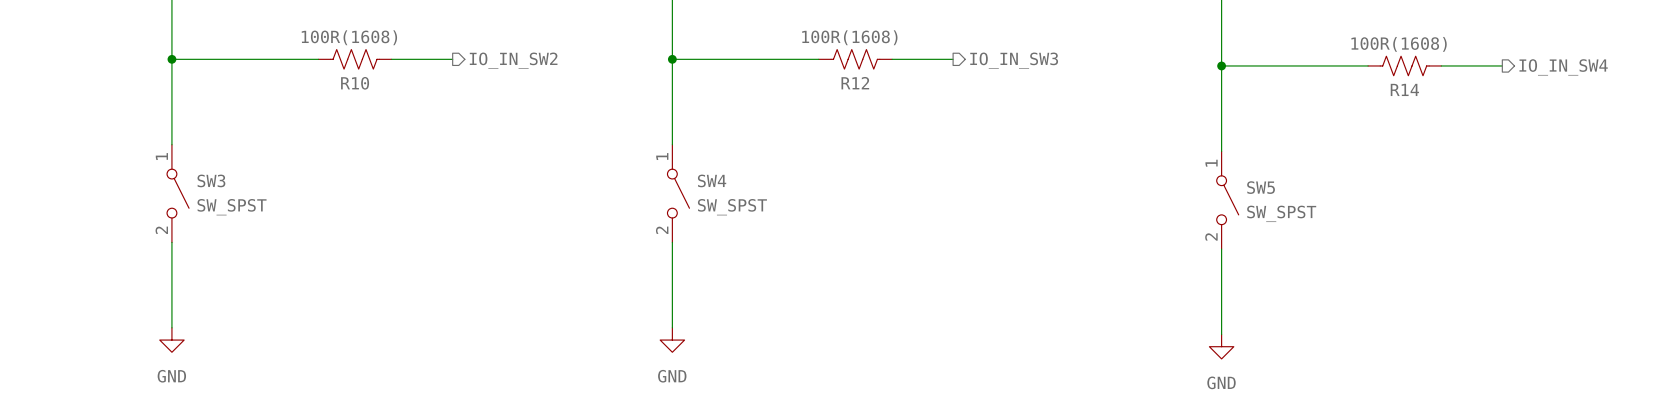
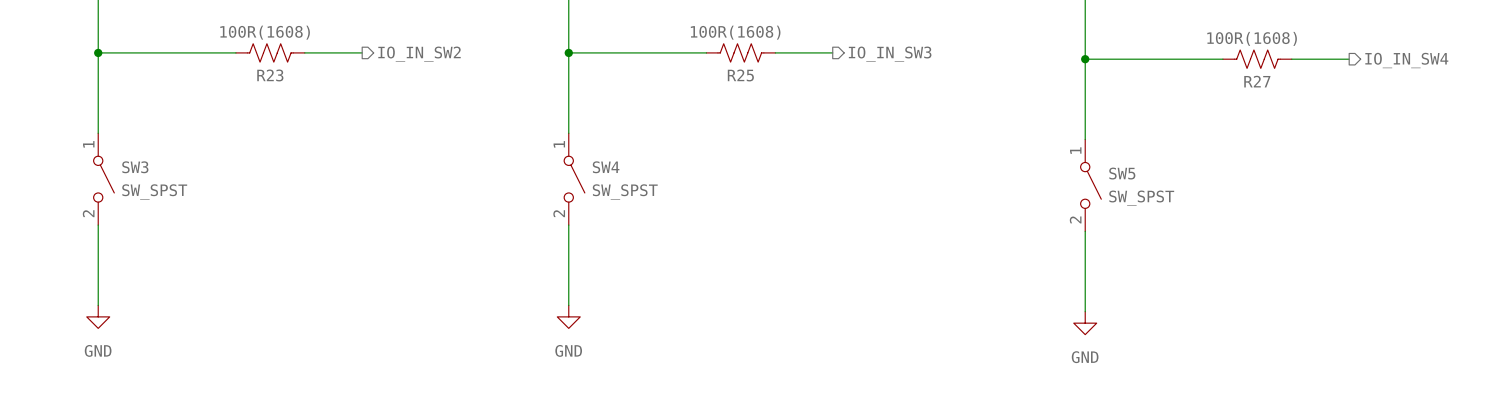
R10 name: R10 (355, 83) -> R23 (270, 75)
R12 name: R12 (855, 83) -> R25 (740, 75)
R14 name: R14 (1404, 89) -> R27 (1257, 81)

